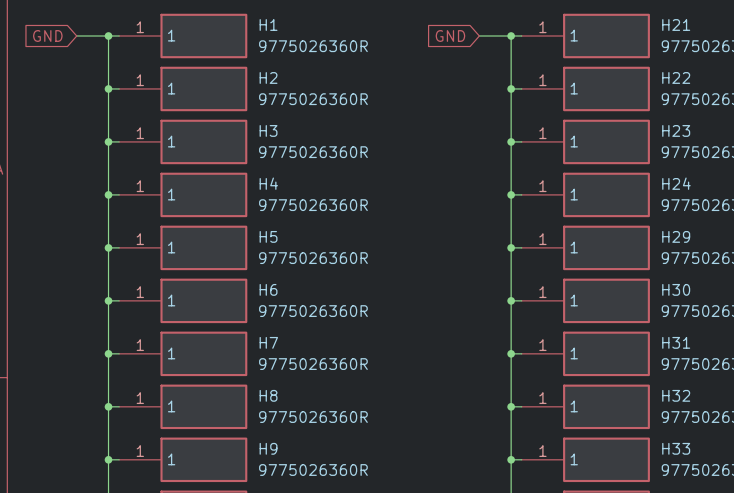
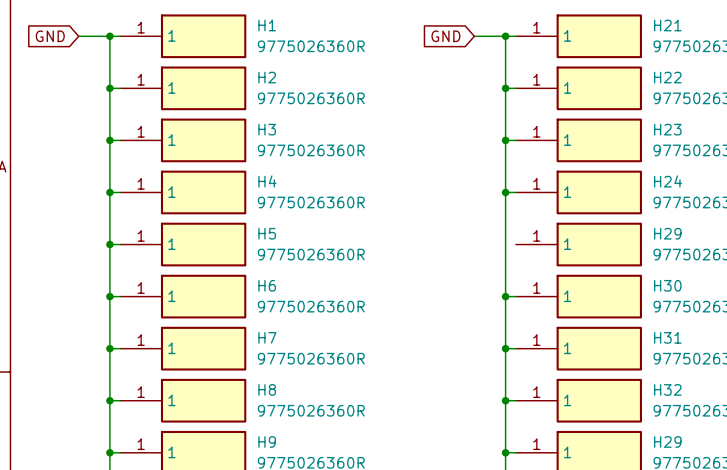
wire: (511, 247) (521, 247) -> none
junction: (511, 247) -> none
H33 name: H33 (676, 448) -> H29 (667, 441)

